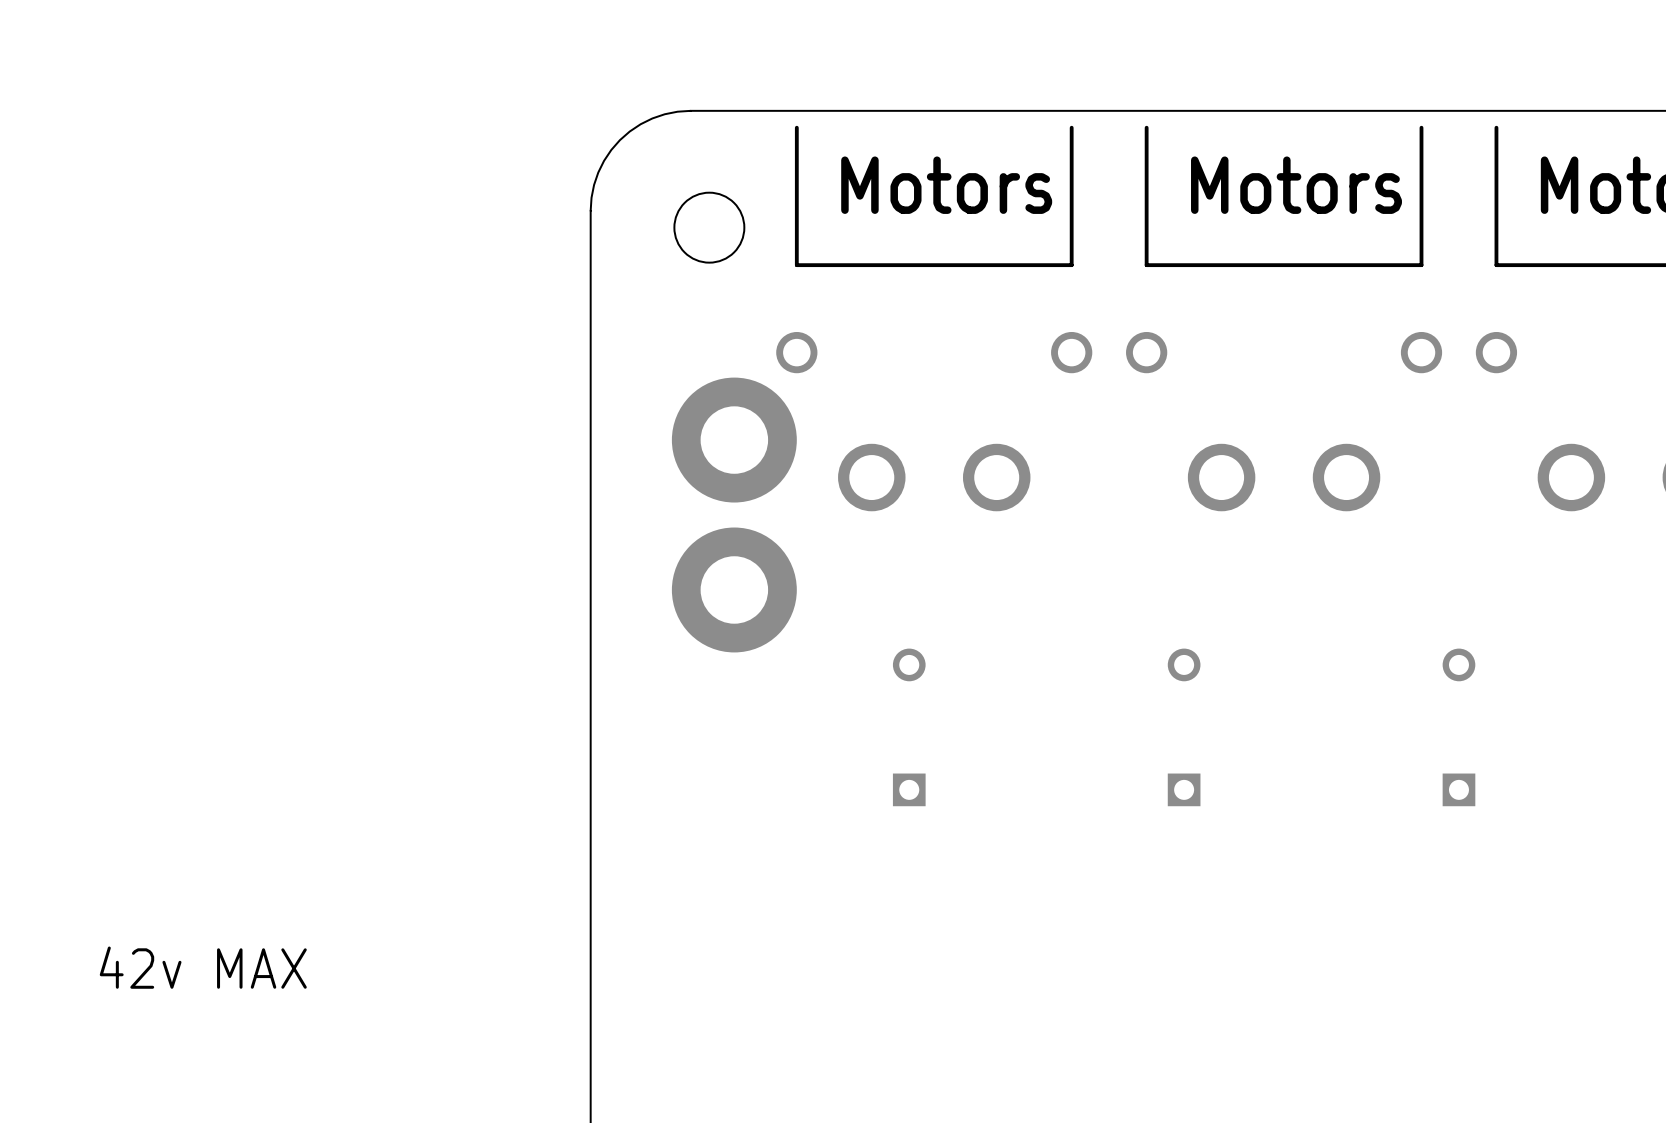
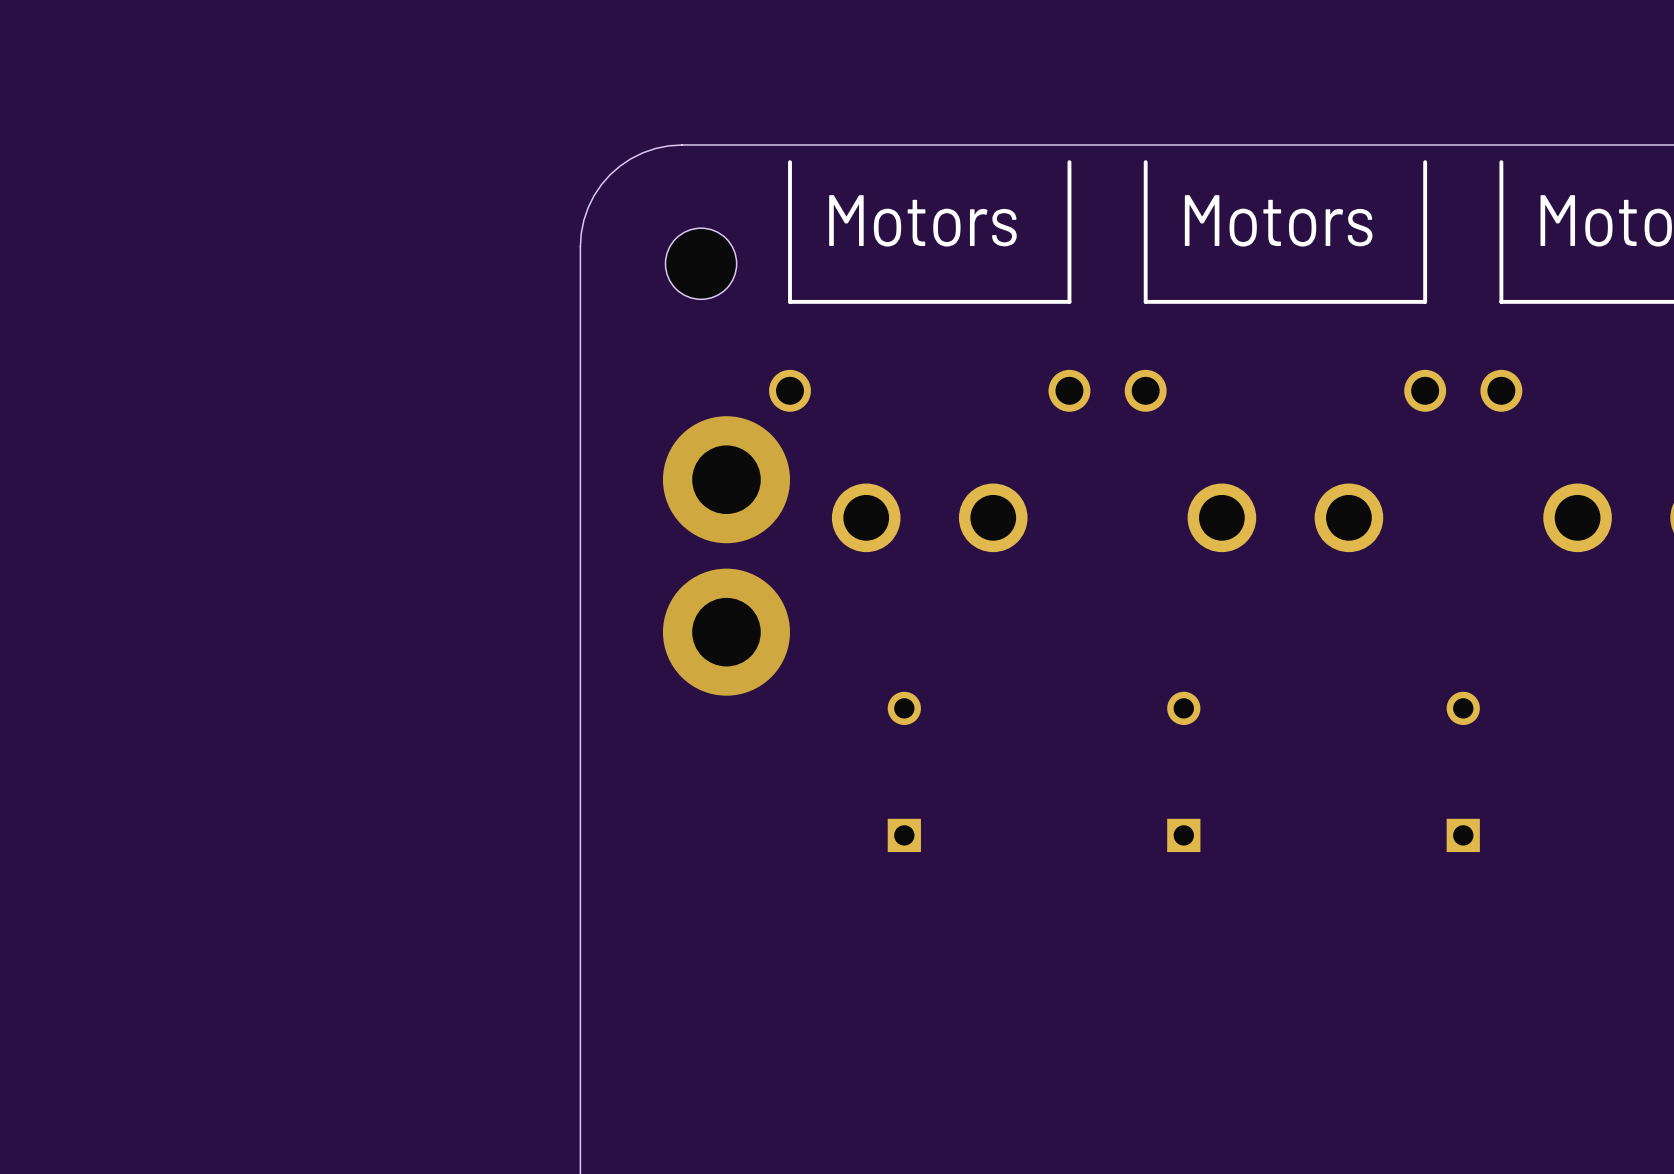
text: 42v MAX (203, 967) -> none

